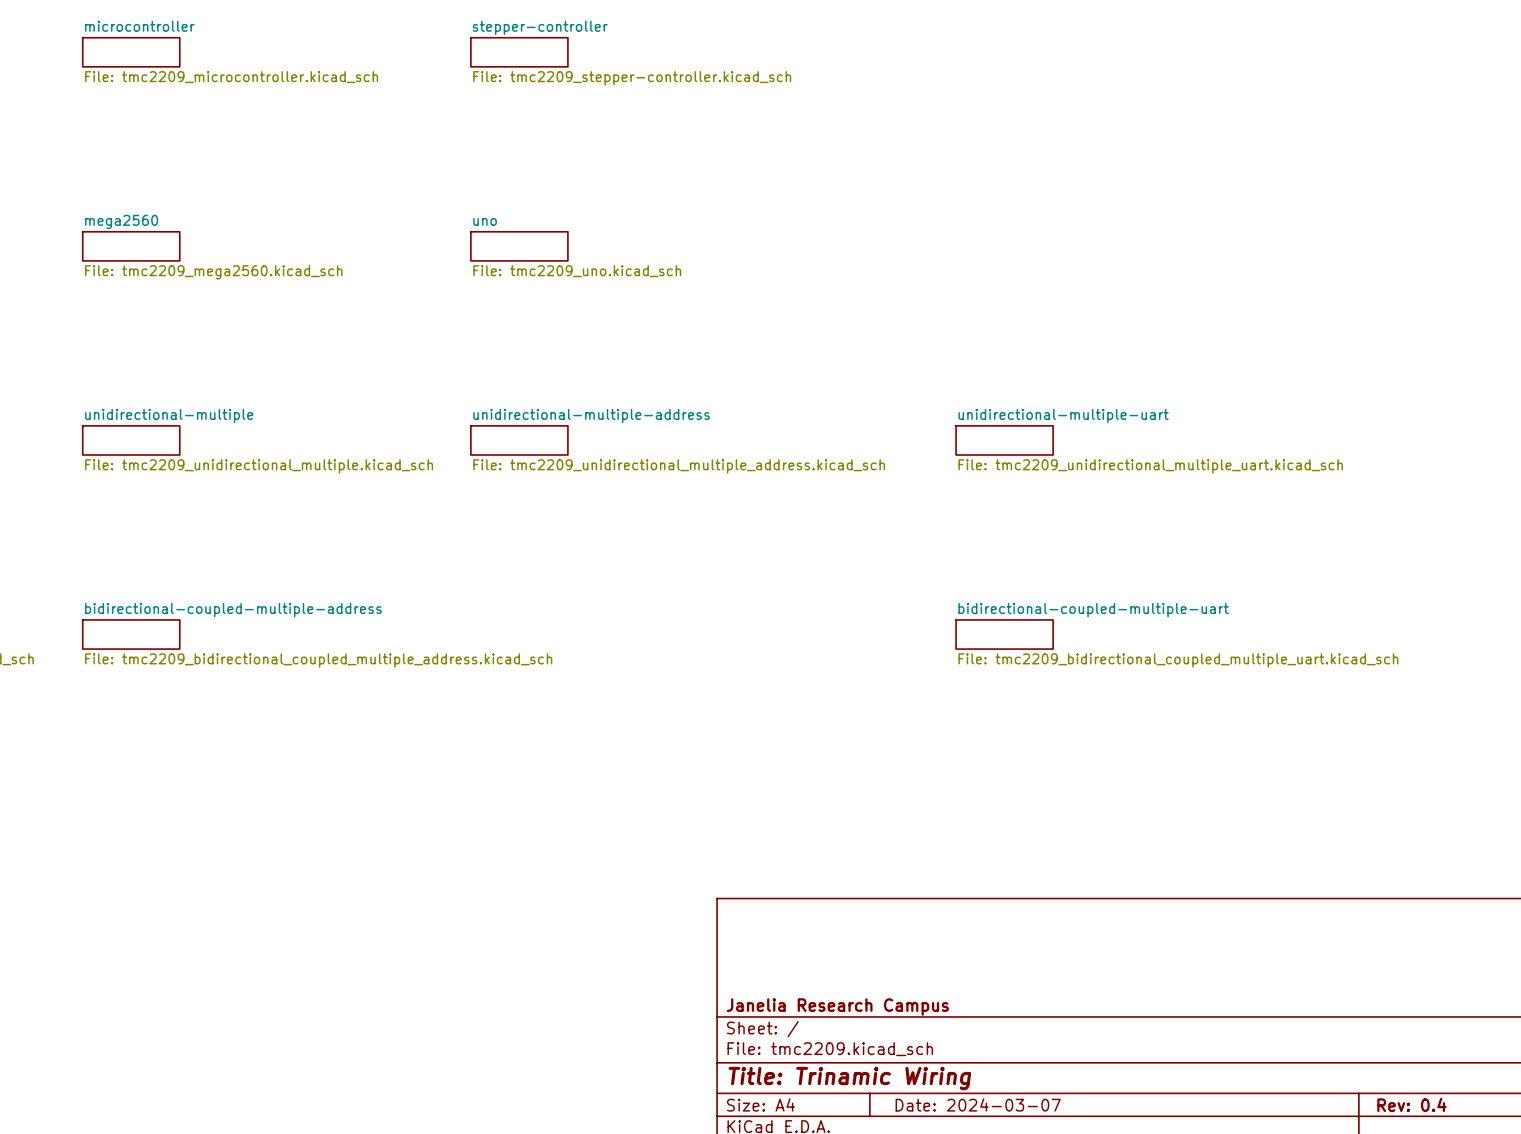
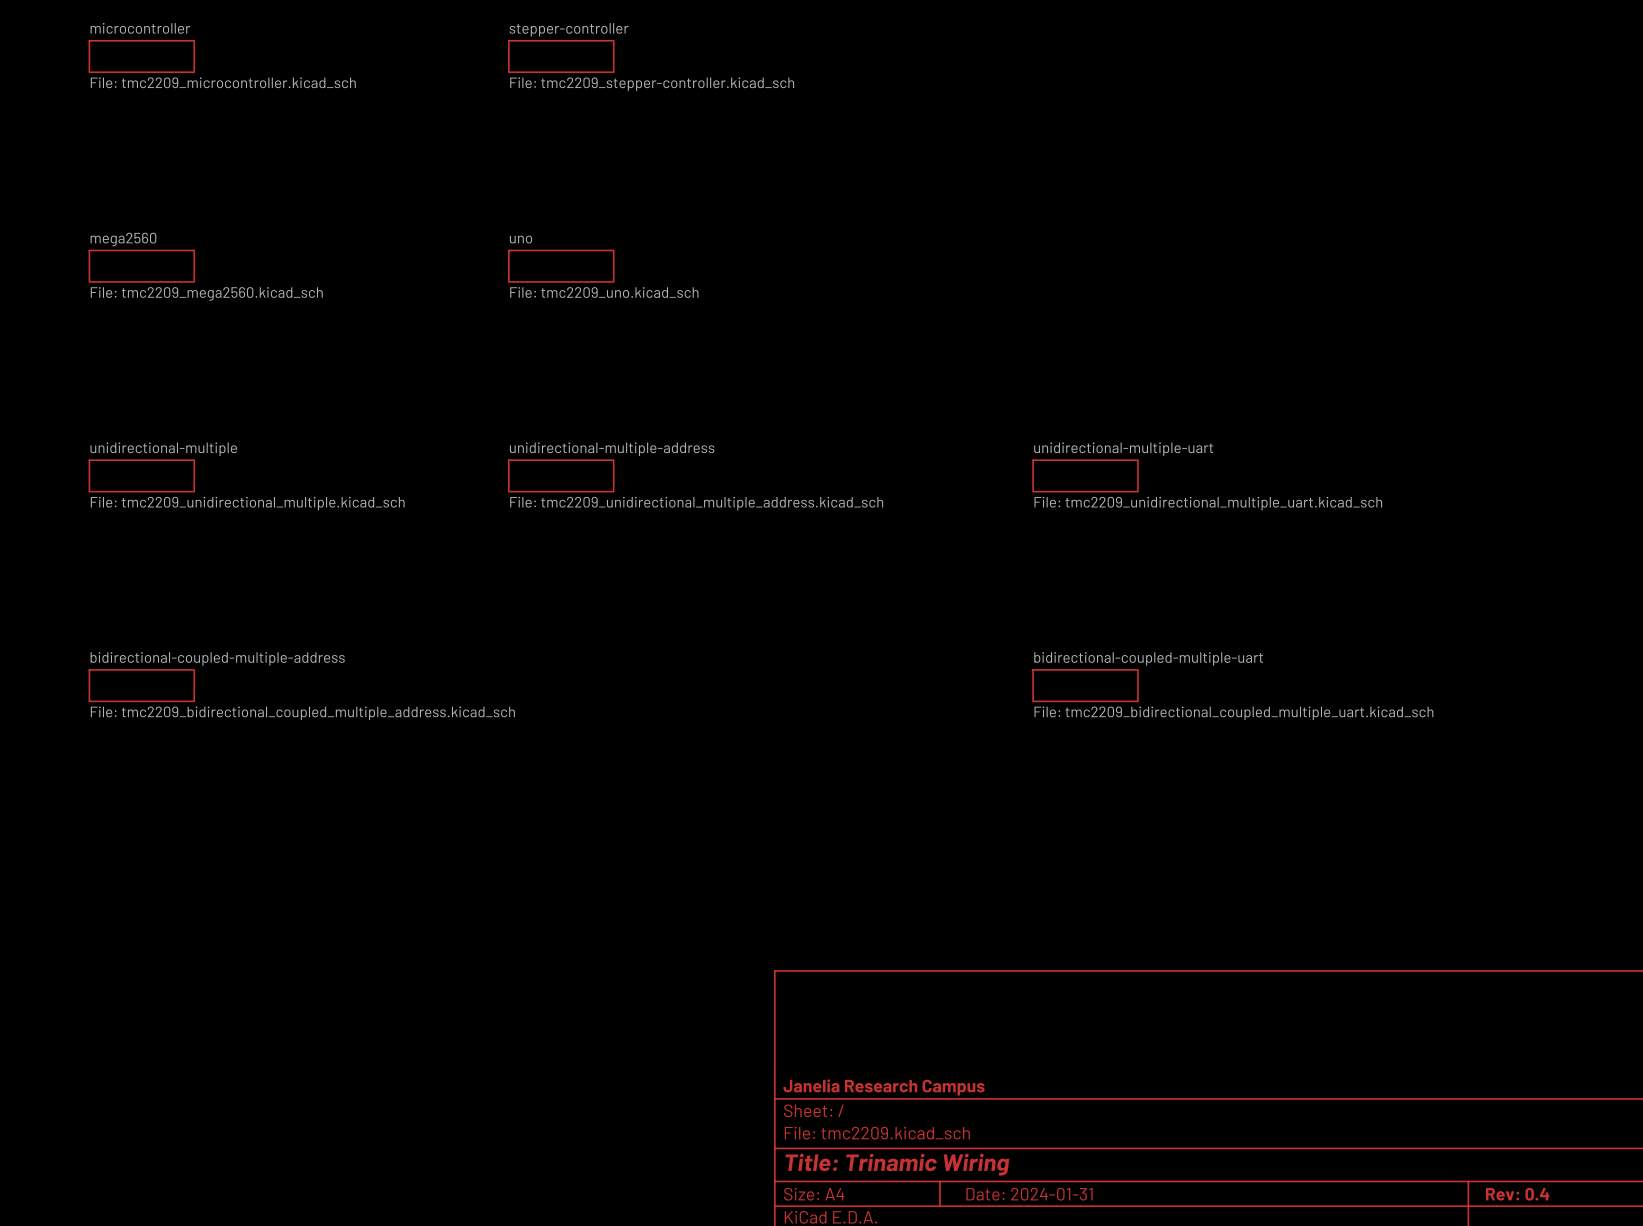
title block: Date: 2024-03-07 (978, 1104) -> Date: 2024-01-31 (1029, 1194)

